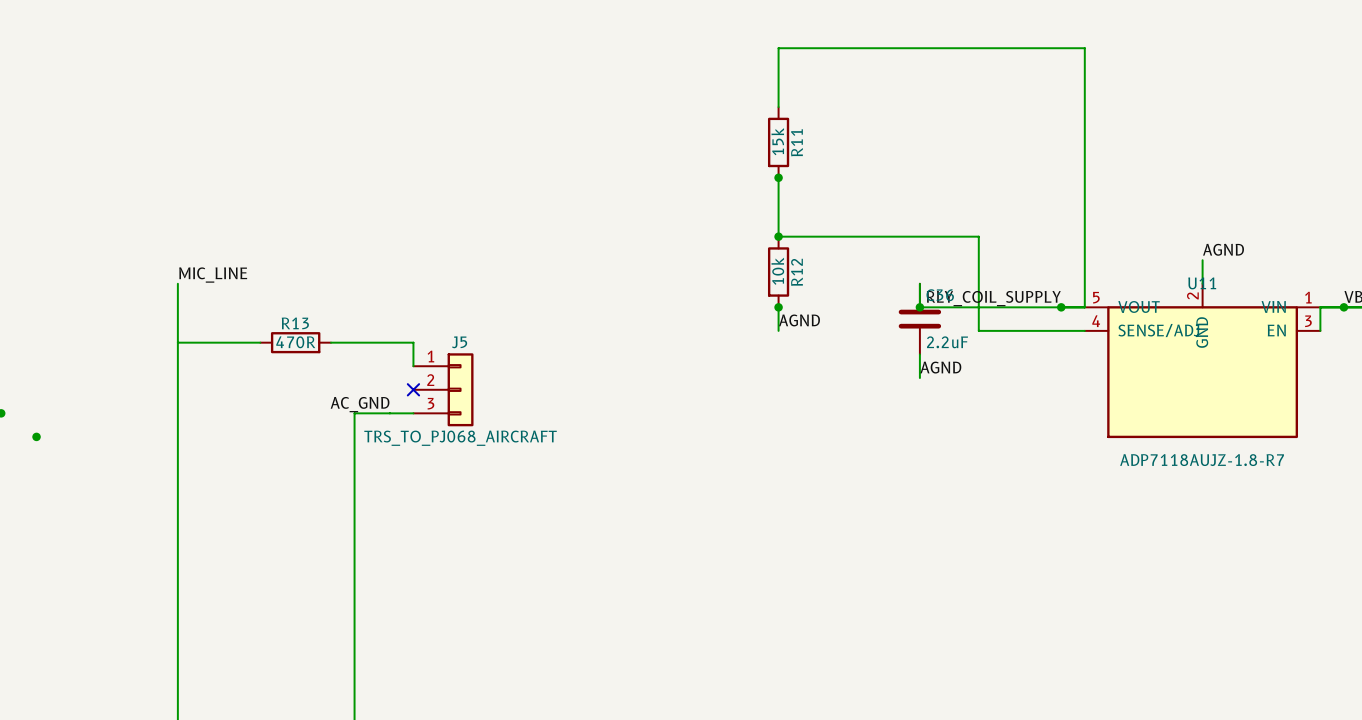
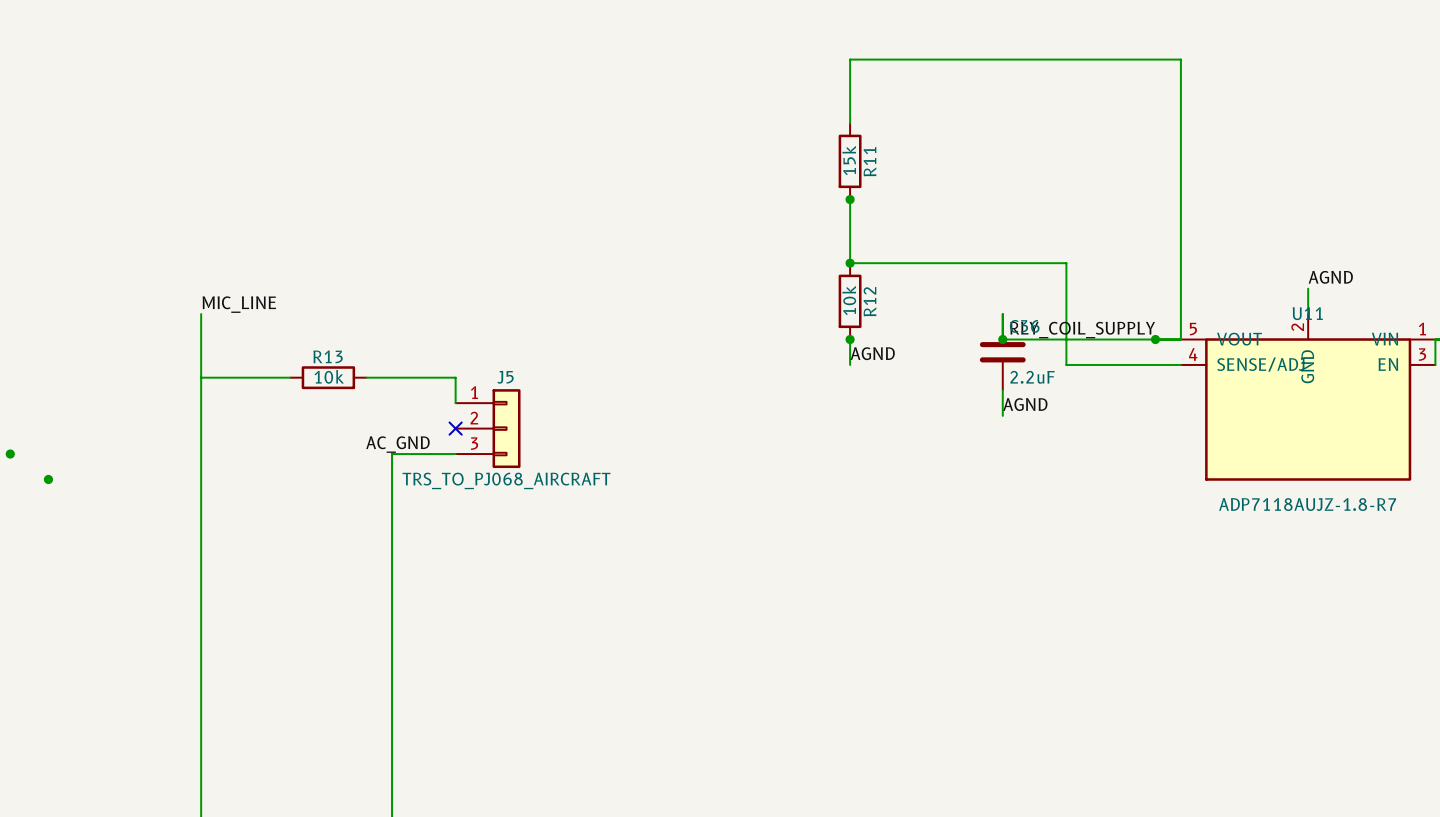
R13 value: 470R (295, 342) -> 10k (329, 376)

